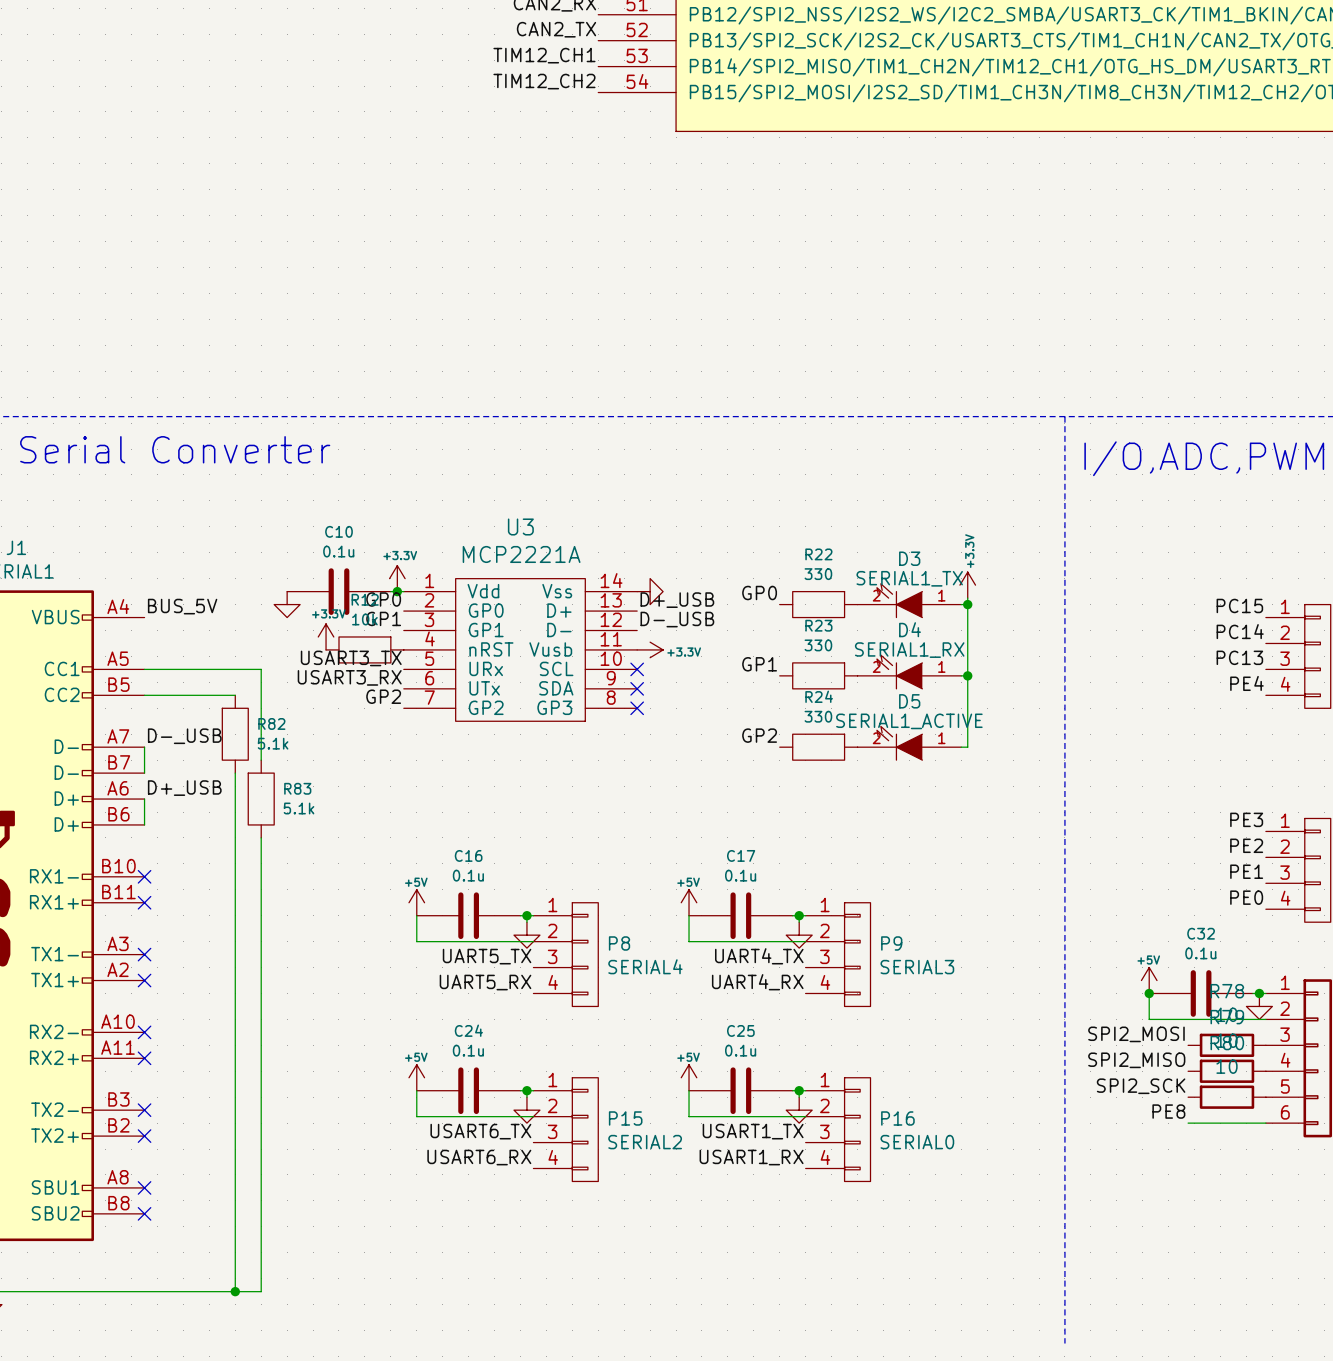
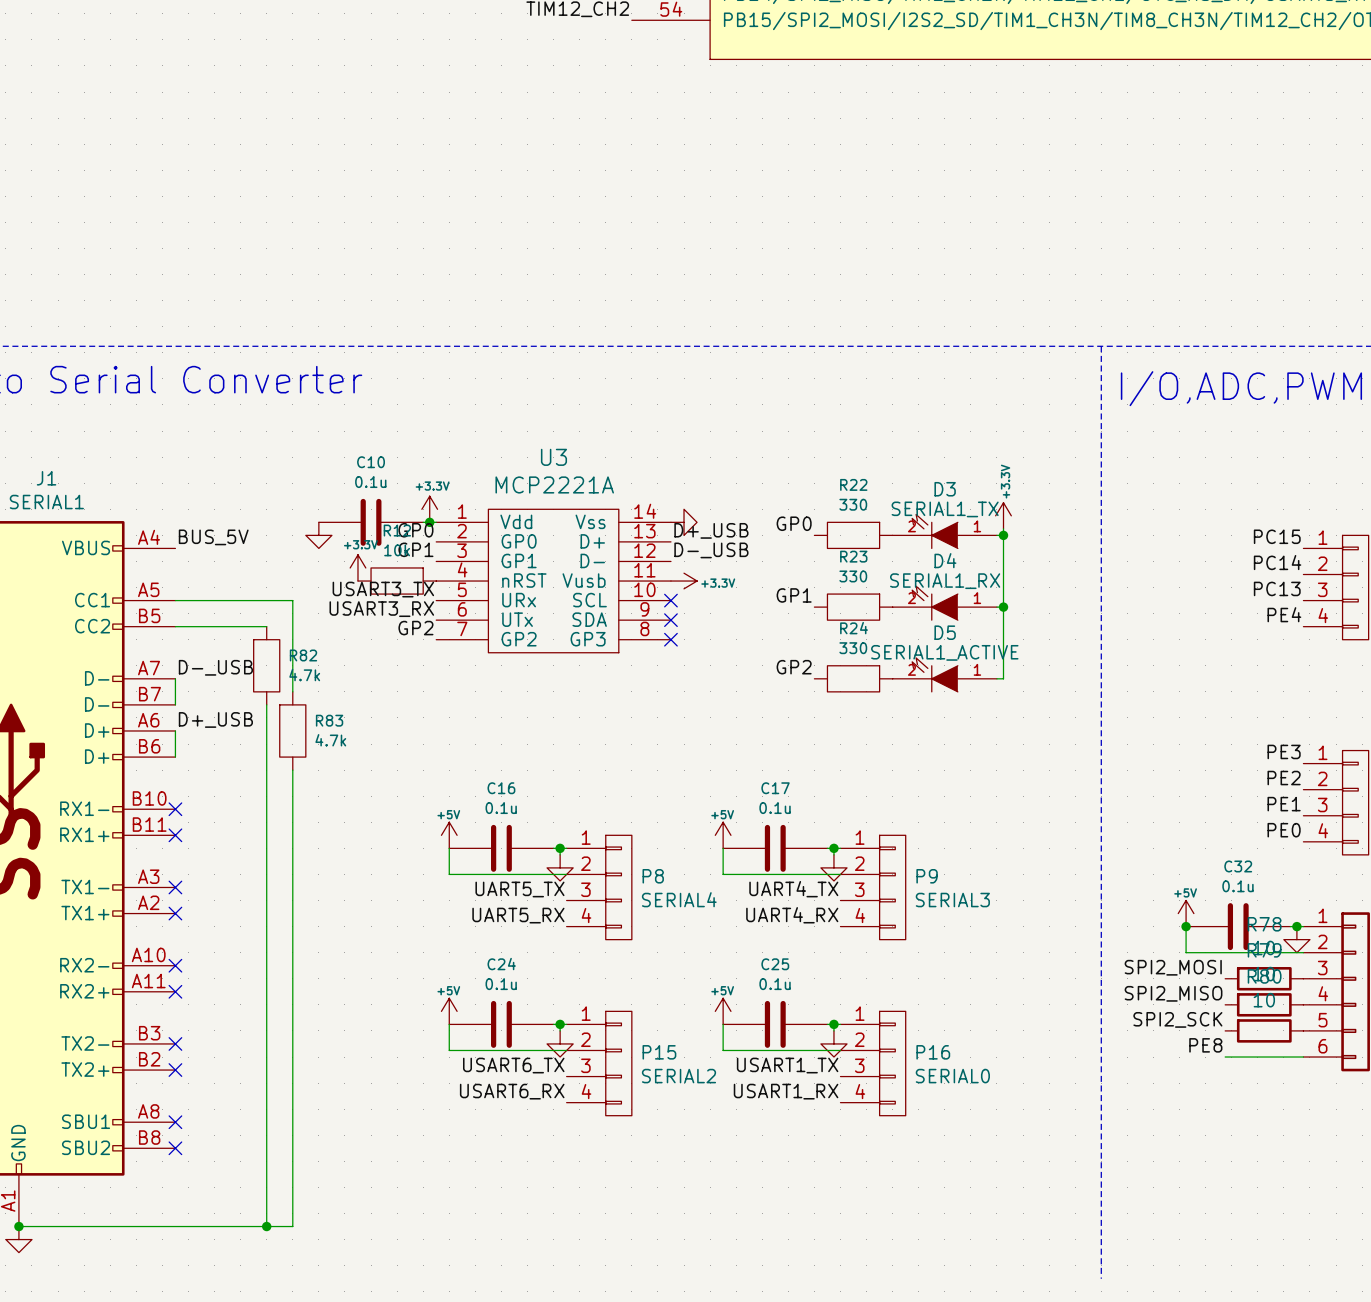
R82 value: 5.1k (273, 743) -> 4.7k (304, 675)
R83 value: 5.1k (299, 808) -> 4.7k (330, 740)

